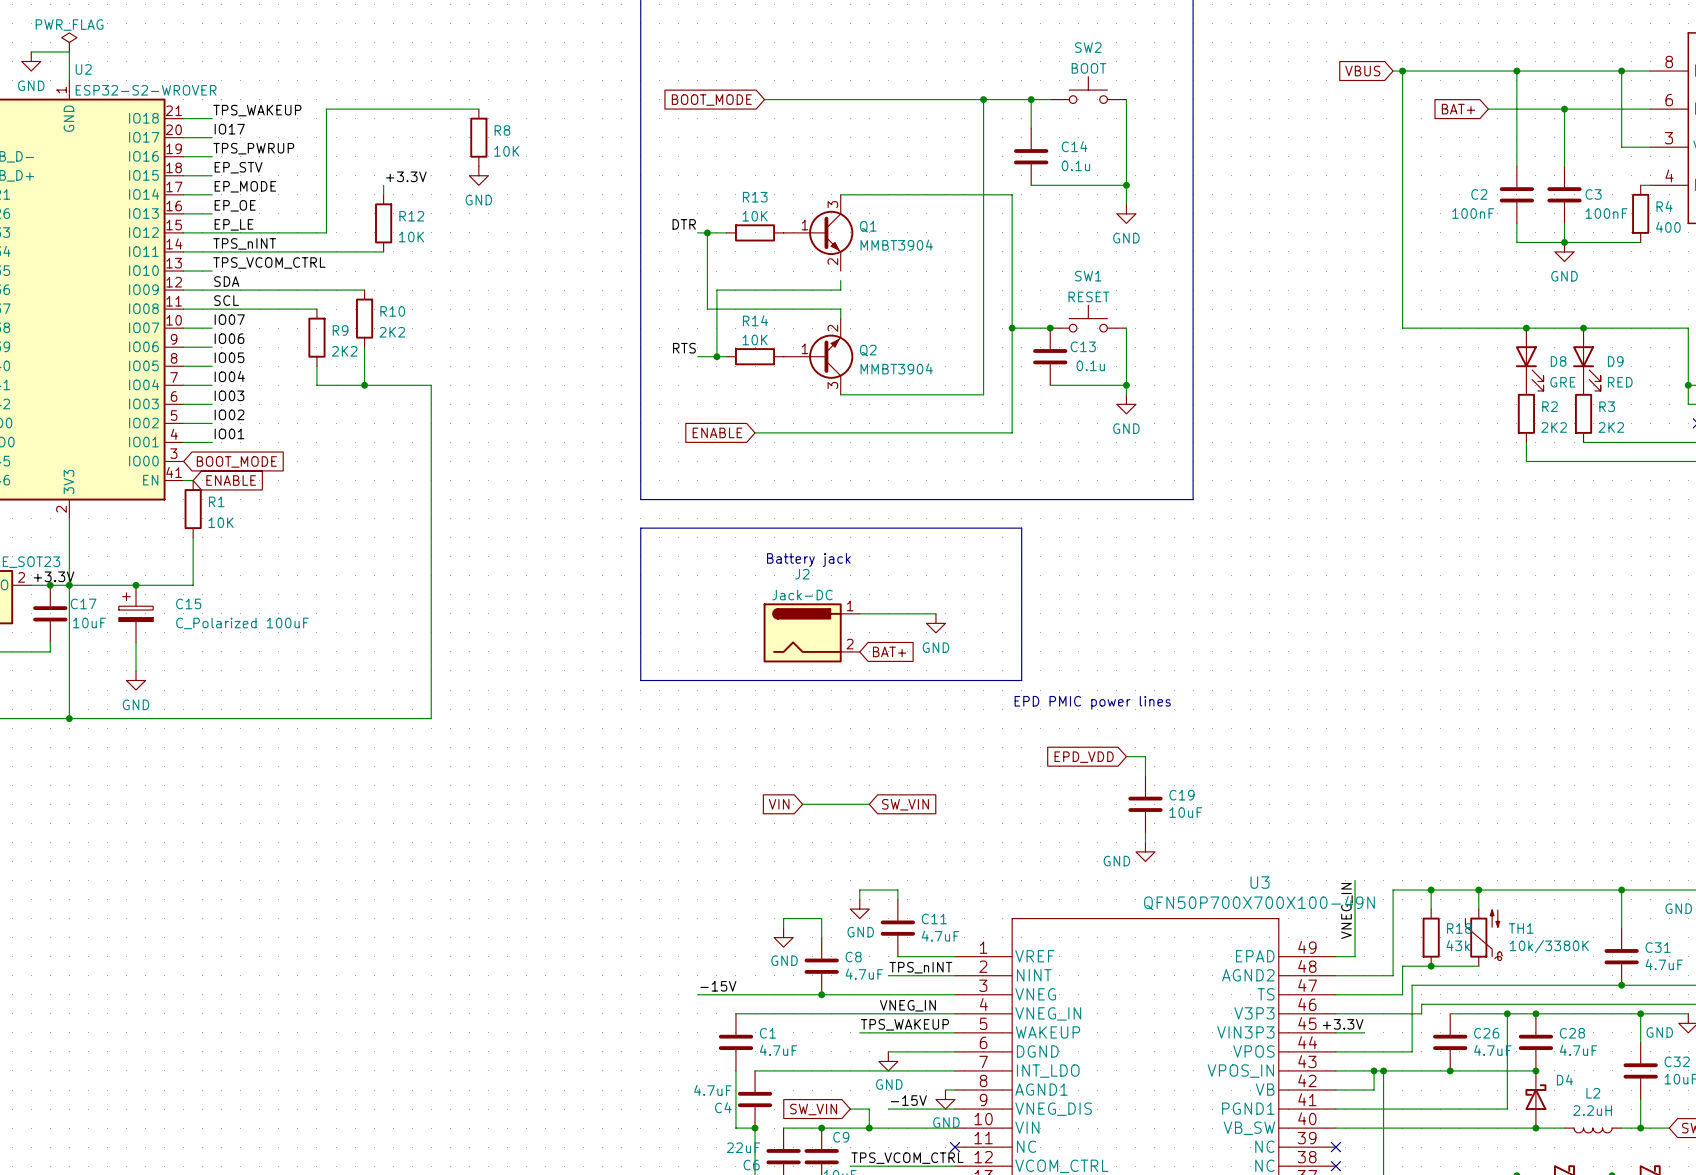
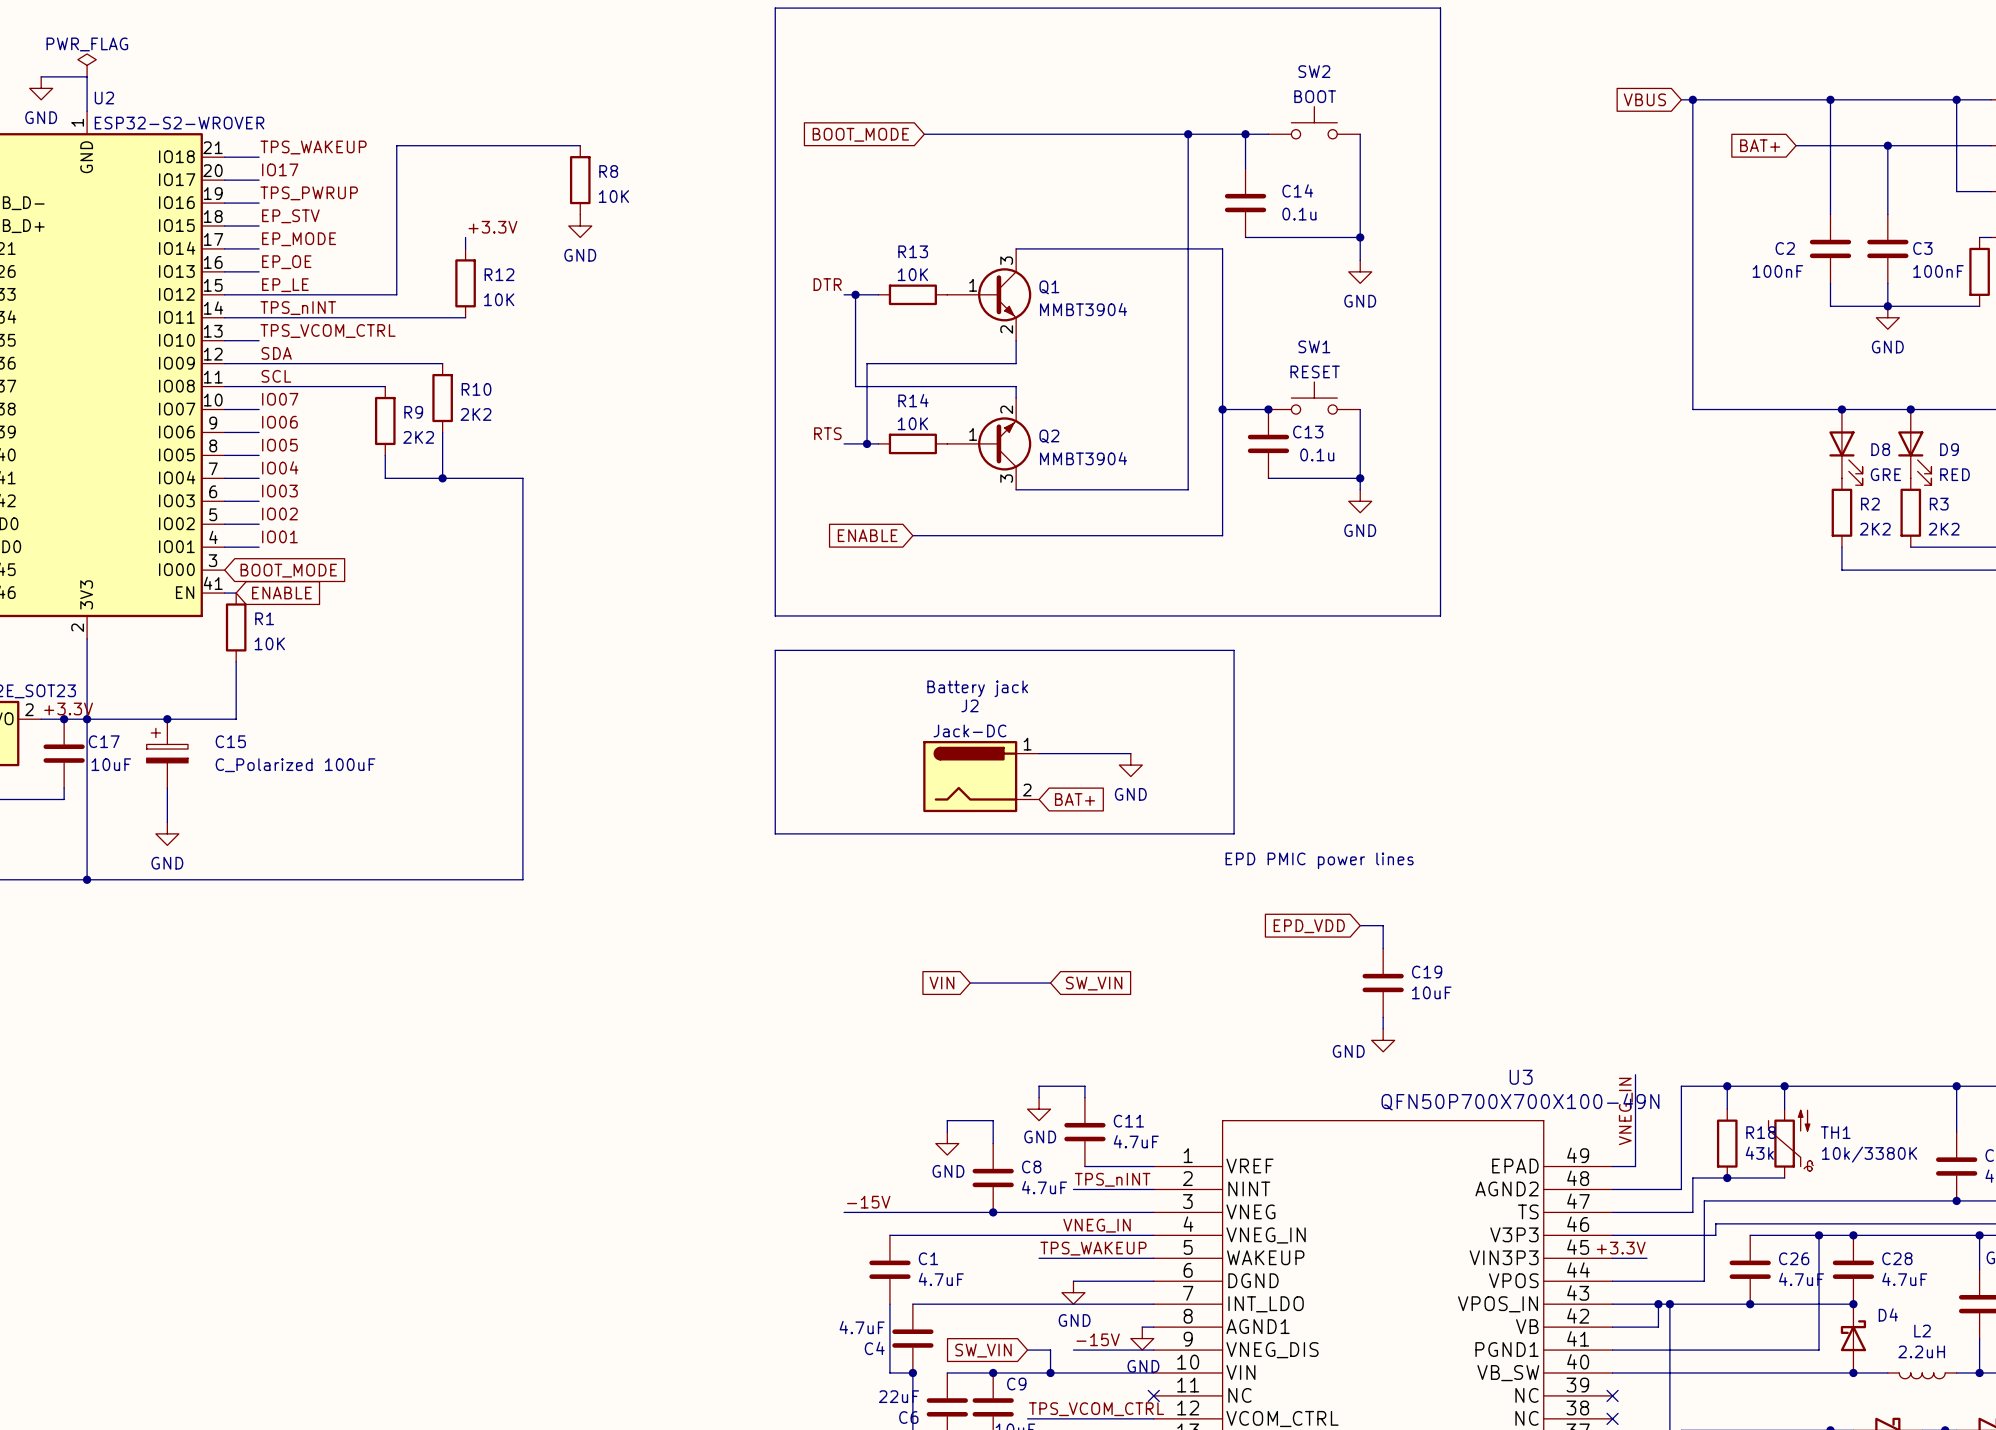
wire: none -> (1016, 340) (1016, 352)

